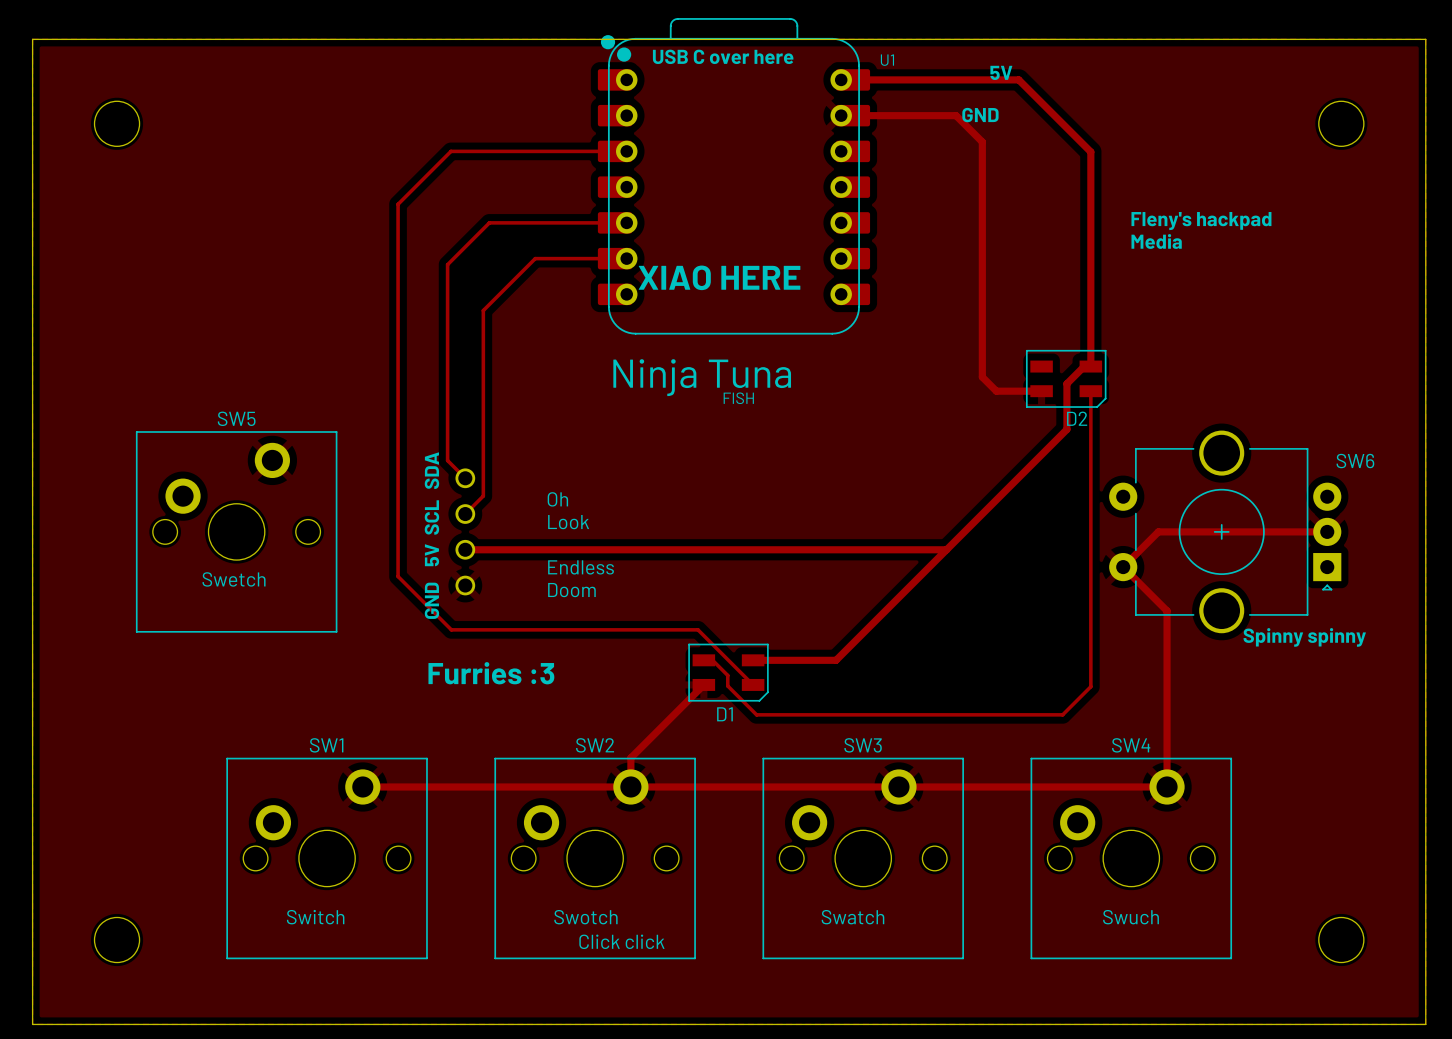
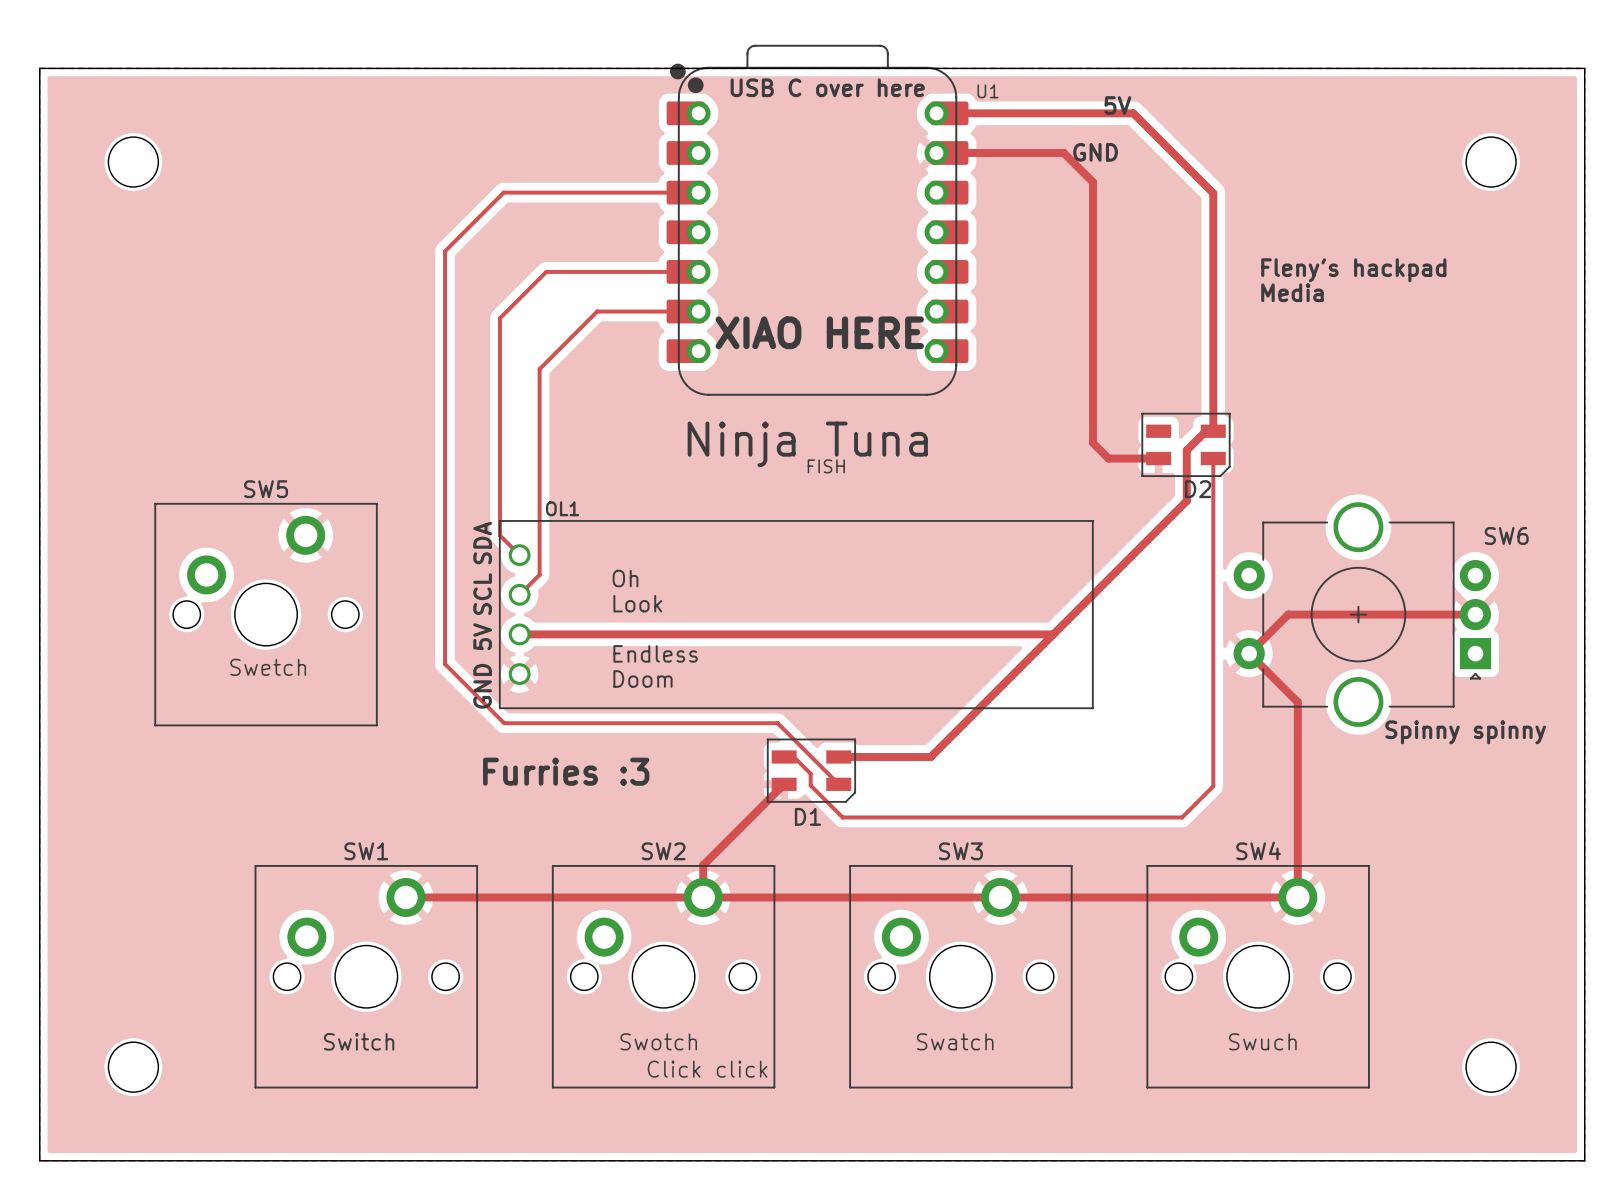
OL1: none -> (796, 614)

